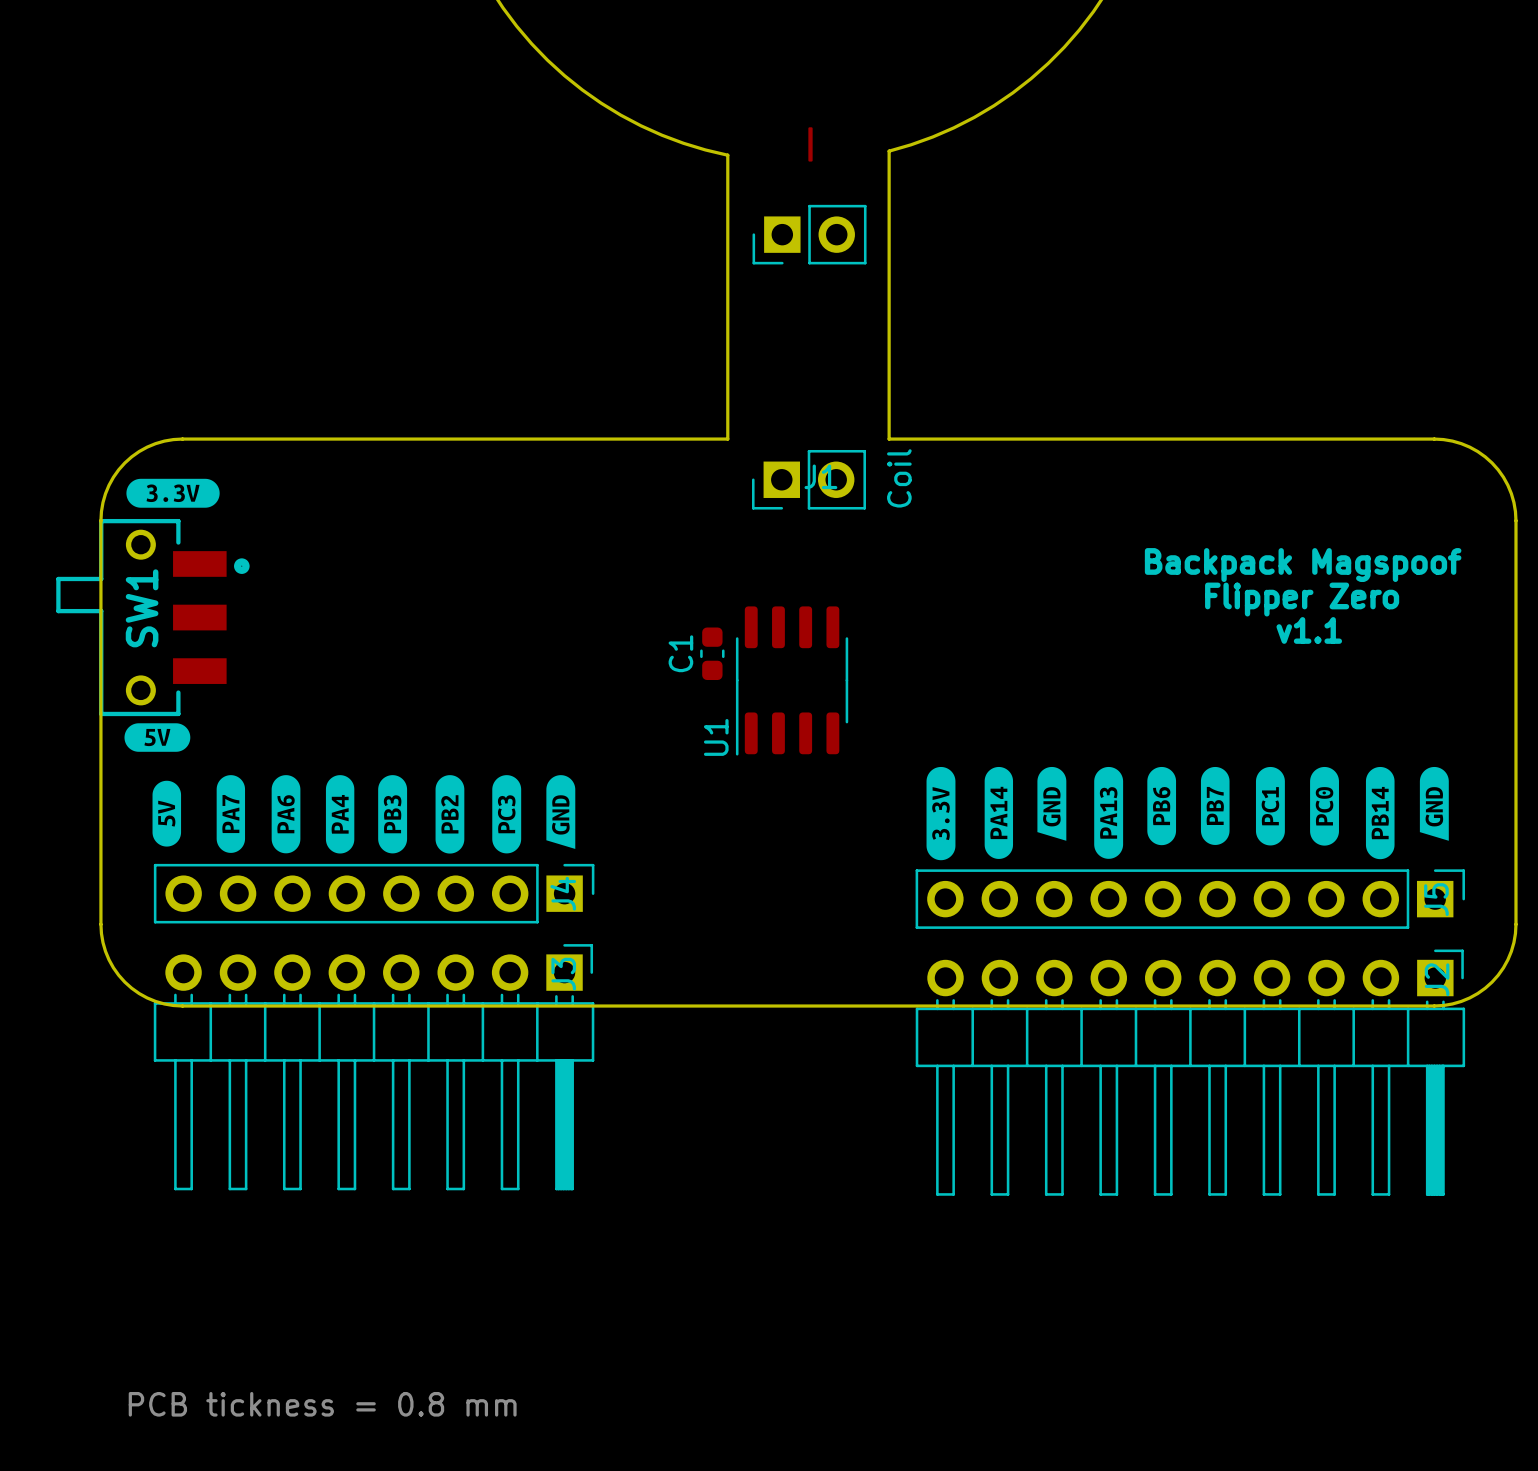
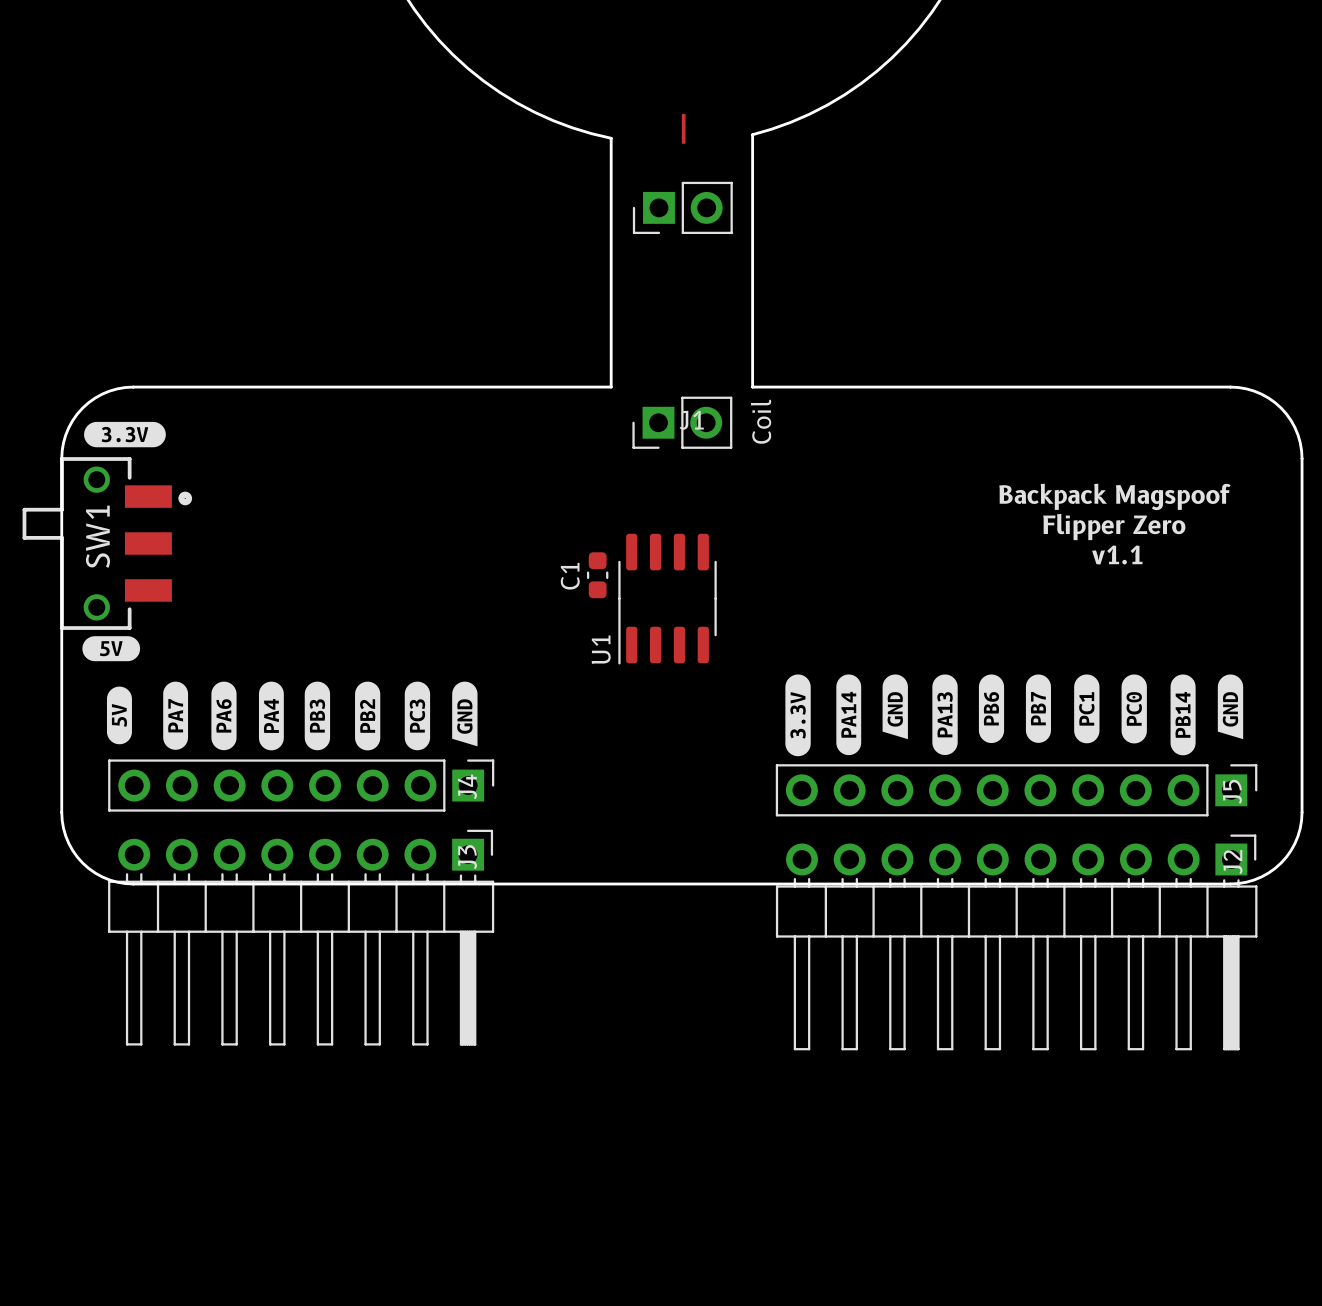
text: PCB tickness = 0.8 mm (322, 1404) -> none

